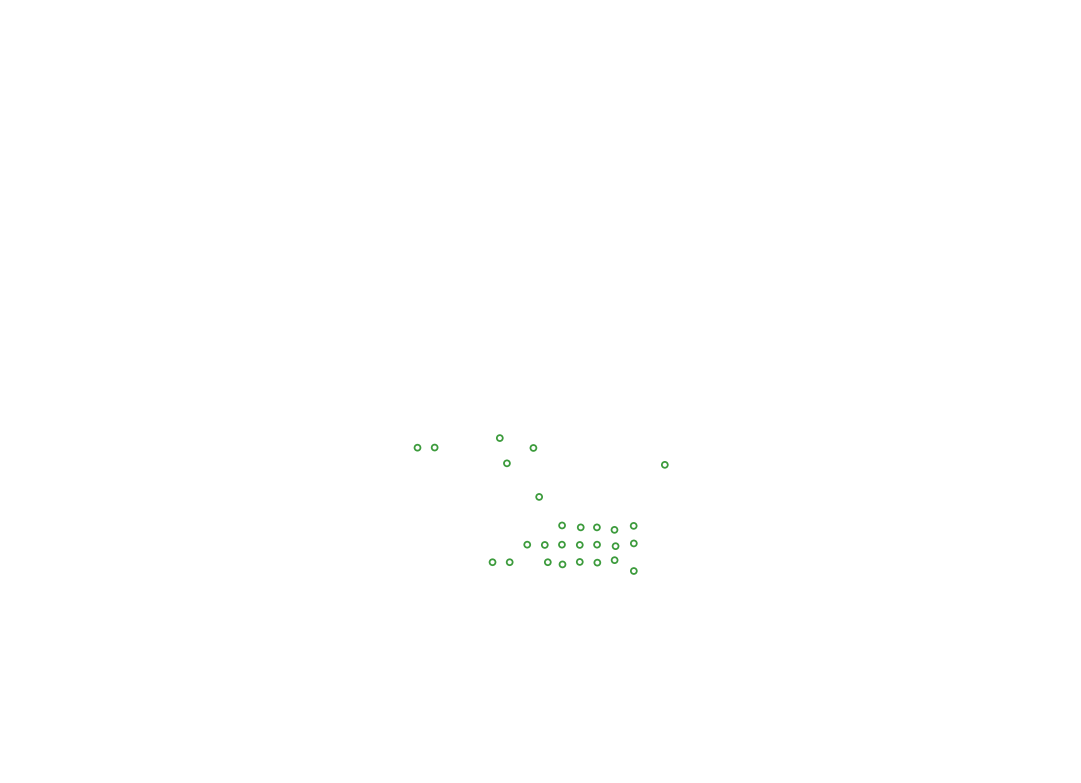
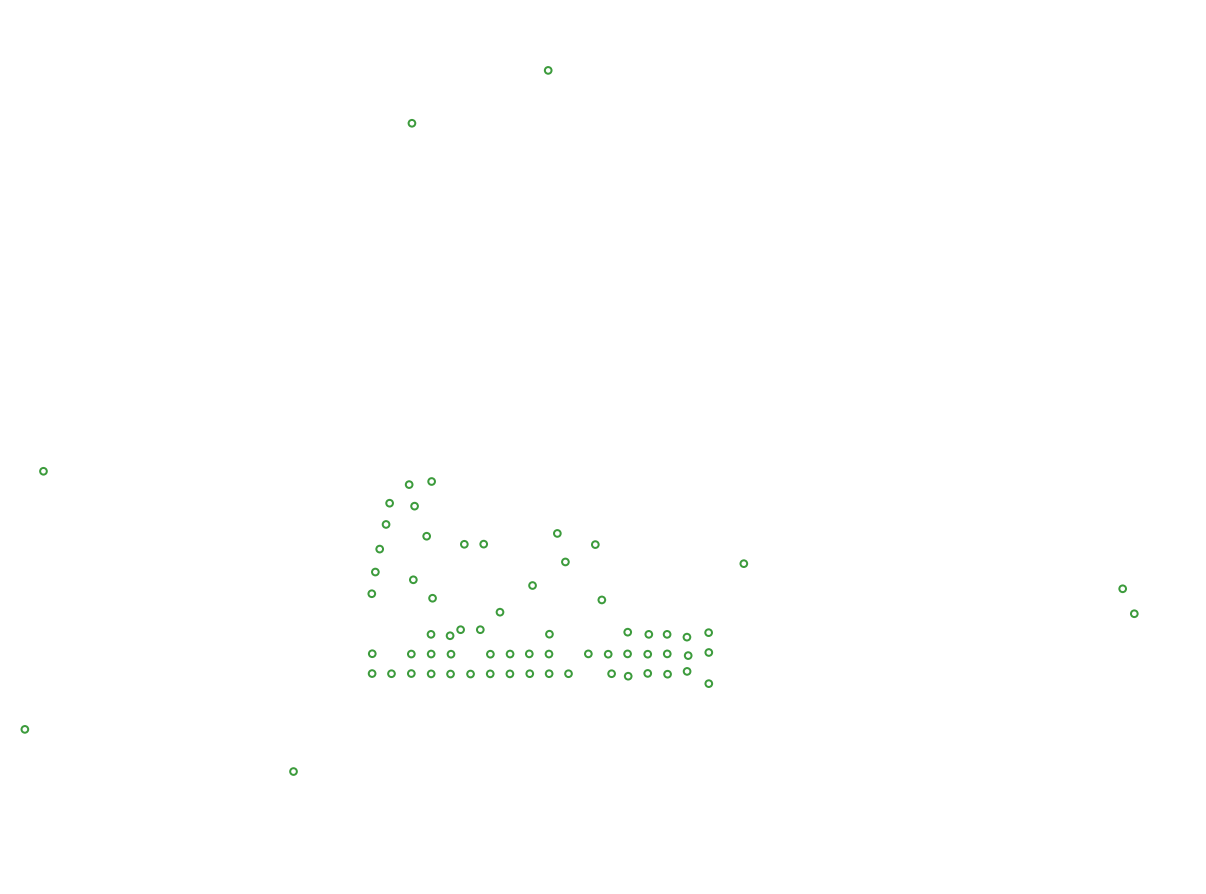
via: none -> (548, 70)
via: none -> (411, 123)
via: none -> (43, 471)
via: none -> (431, 481)
via: none -> (409, 484)
via: none -> (389, 503)
via: none -> (414, 506)
via: none -> (386, 524)
via: none -> (426, 536)
via: none -> (379, 549)
via: none -> (375, 572)
via: none -> (413, 579)
via: none -> (532, 585)
via: none -> (1122, 588)
via: none -> (371, 593)
via: none -> (432, 598)
via: none -> (499, 612)
via: none -> (1134, 613)
via: none -> (460, 629)
via: none -> (480, 629)
via: none -> (431, 634)
via: none -> (549, 634)
via: none -> (450, 635)
via: none -> (372, 653)
via: none -> (411, 654)
via: none -> (431, 654)
via: none -> (451, 654)
via: none -> (490, 654)
via: none -> (510, 654)
via: none -> (529, 653)
via: none -> (548, 654)
via: none -> (372, 673)
via: none -> (391, 673)
via: none -> (411, 673)
via: none -> (431, 673)
via: none -> (450, 674)
via: none -> (470, 674)
via: none -> (490, 673)
via: none -> (509, 673)
via: none -> (529, 673)
via: none -> (24, 729)
via: none -> (293, 771)

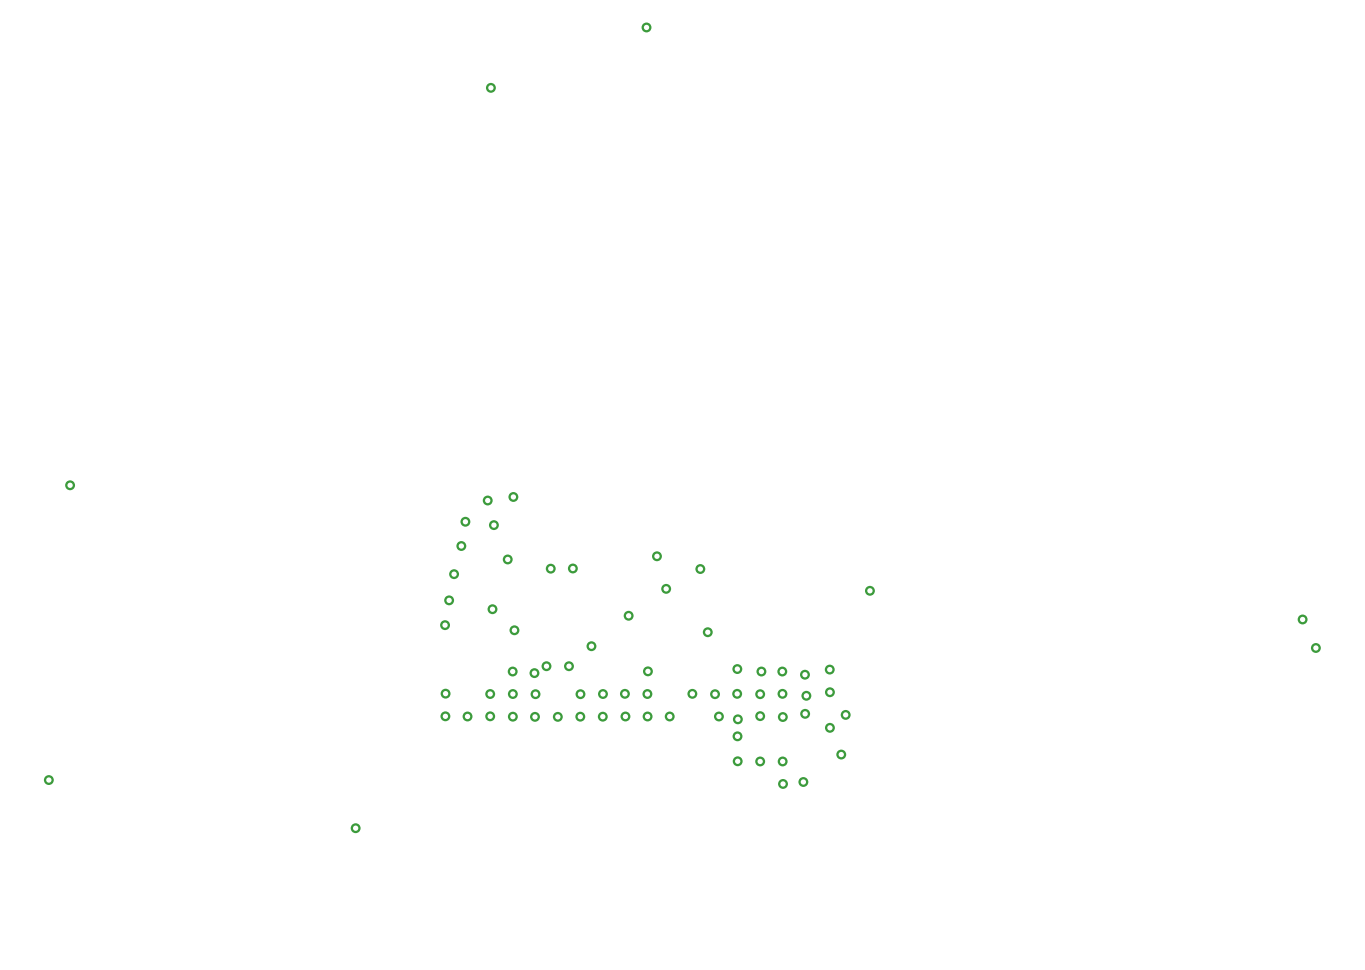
via: none -> (845, 714)
via: none -> (737, 736)
via: none -> (841, 754)
via: none -> (737, 761)
via: none -> (760, 761)
via: none -> (782, 761)
via: none -> (803, 782)
via: none -> (783, 783)

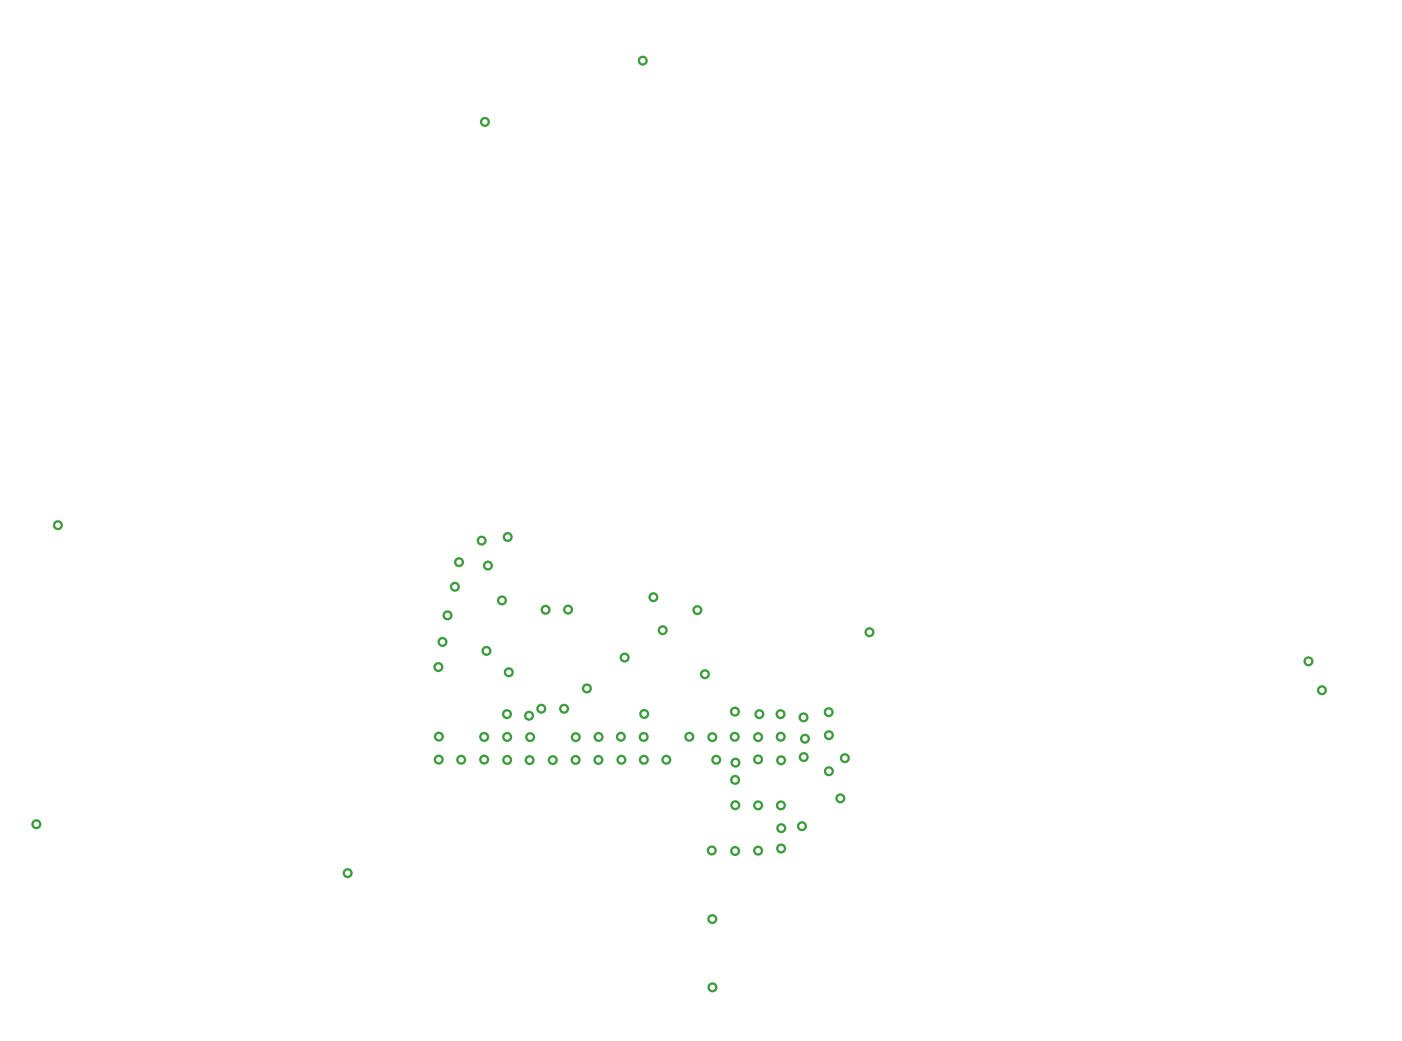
via: none -> (781, 848)
via: none -> (711, 850)
via: none -> (735, 851)
via: none -> (758, 850)
via: none -> (712, 919)
via: none -> (712, 987)

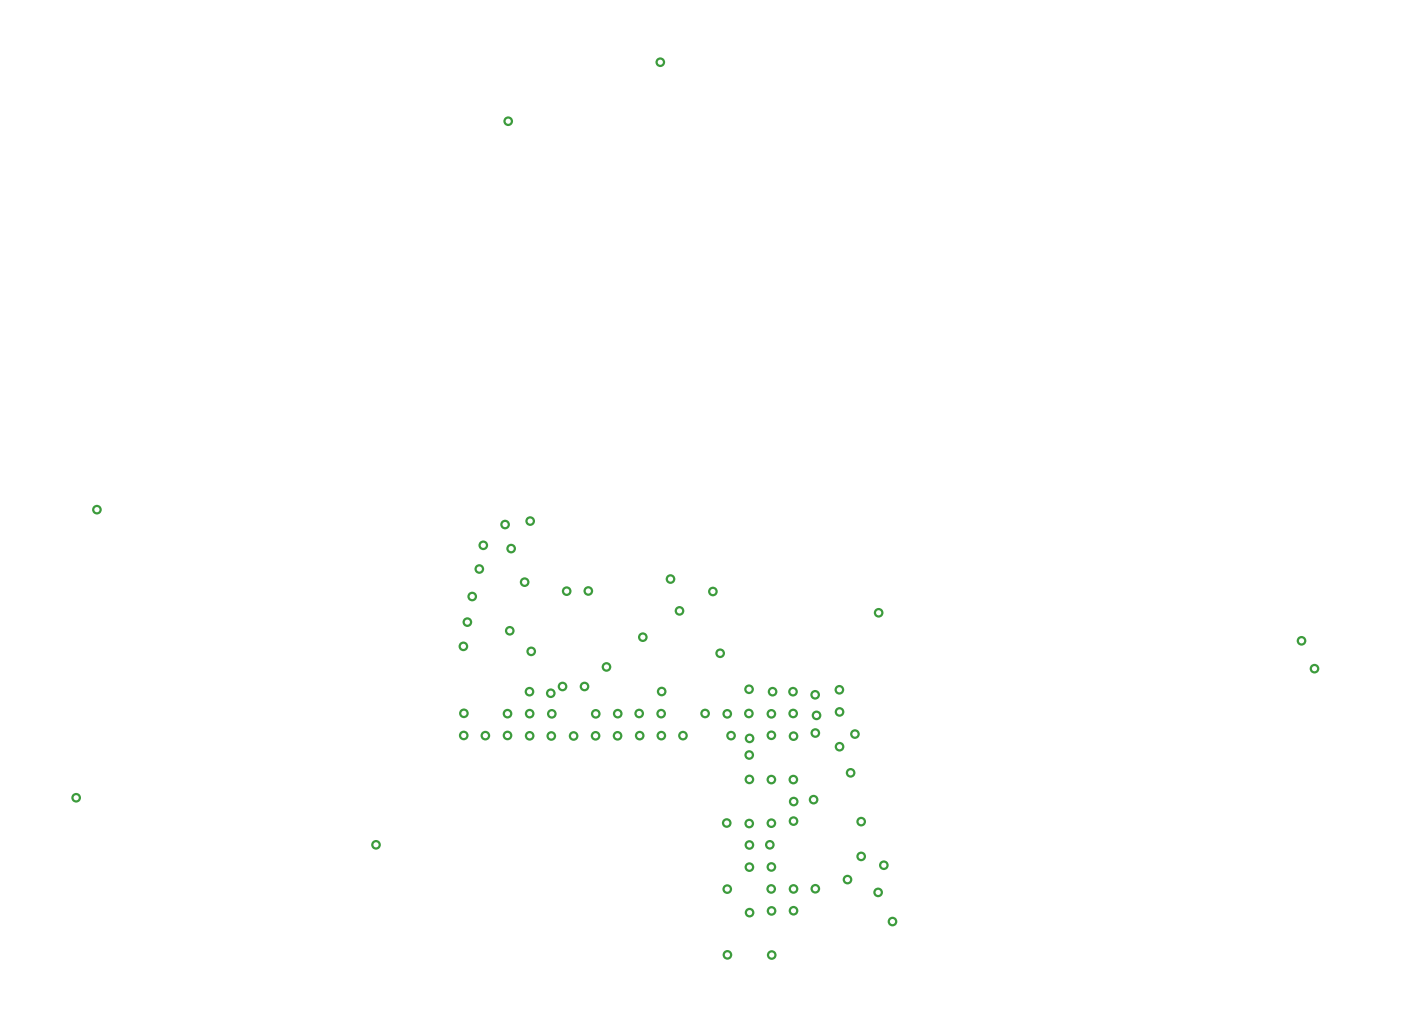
via: none -> (861, 821)
via: none -> (749, 844)
via: none -> (769, 844)
via: none -> (861, 856)
via: none -> (883, 865)
via: none -> (749, 867)
via: none -> (771, 866)
via: none -> (847, 879)
via: none -> (771, 888)
via: none -> (793, 888)
via: none -> (815, 888)
via: none -> (878, 892)
via: none -> (771, 910)
via: none -> (793, 910)
via: none -> (749, 912)
via: none -> (892, 921)
via: none -> (771, 955)

